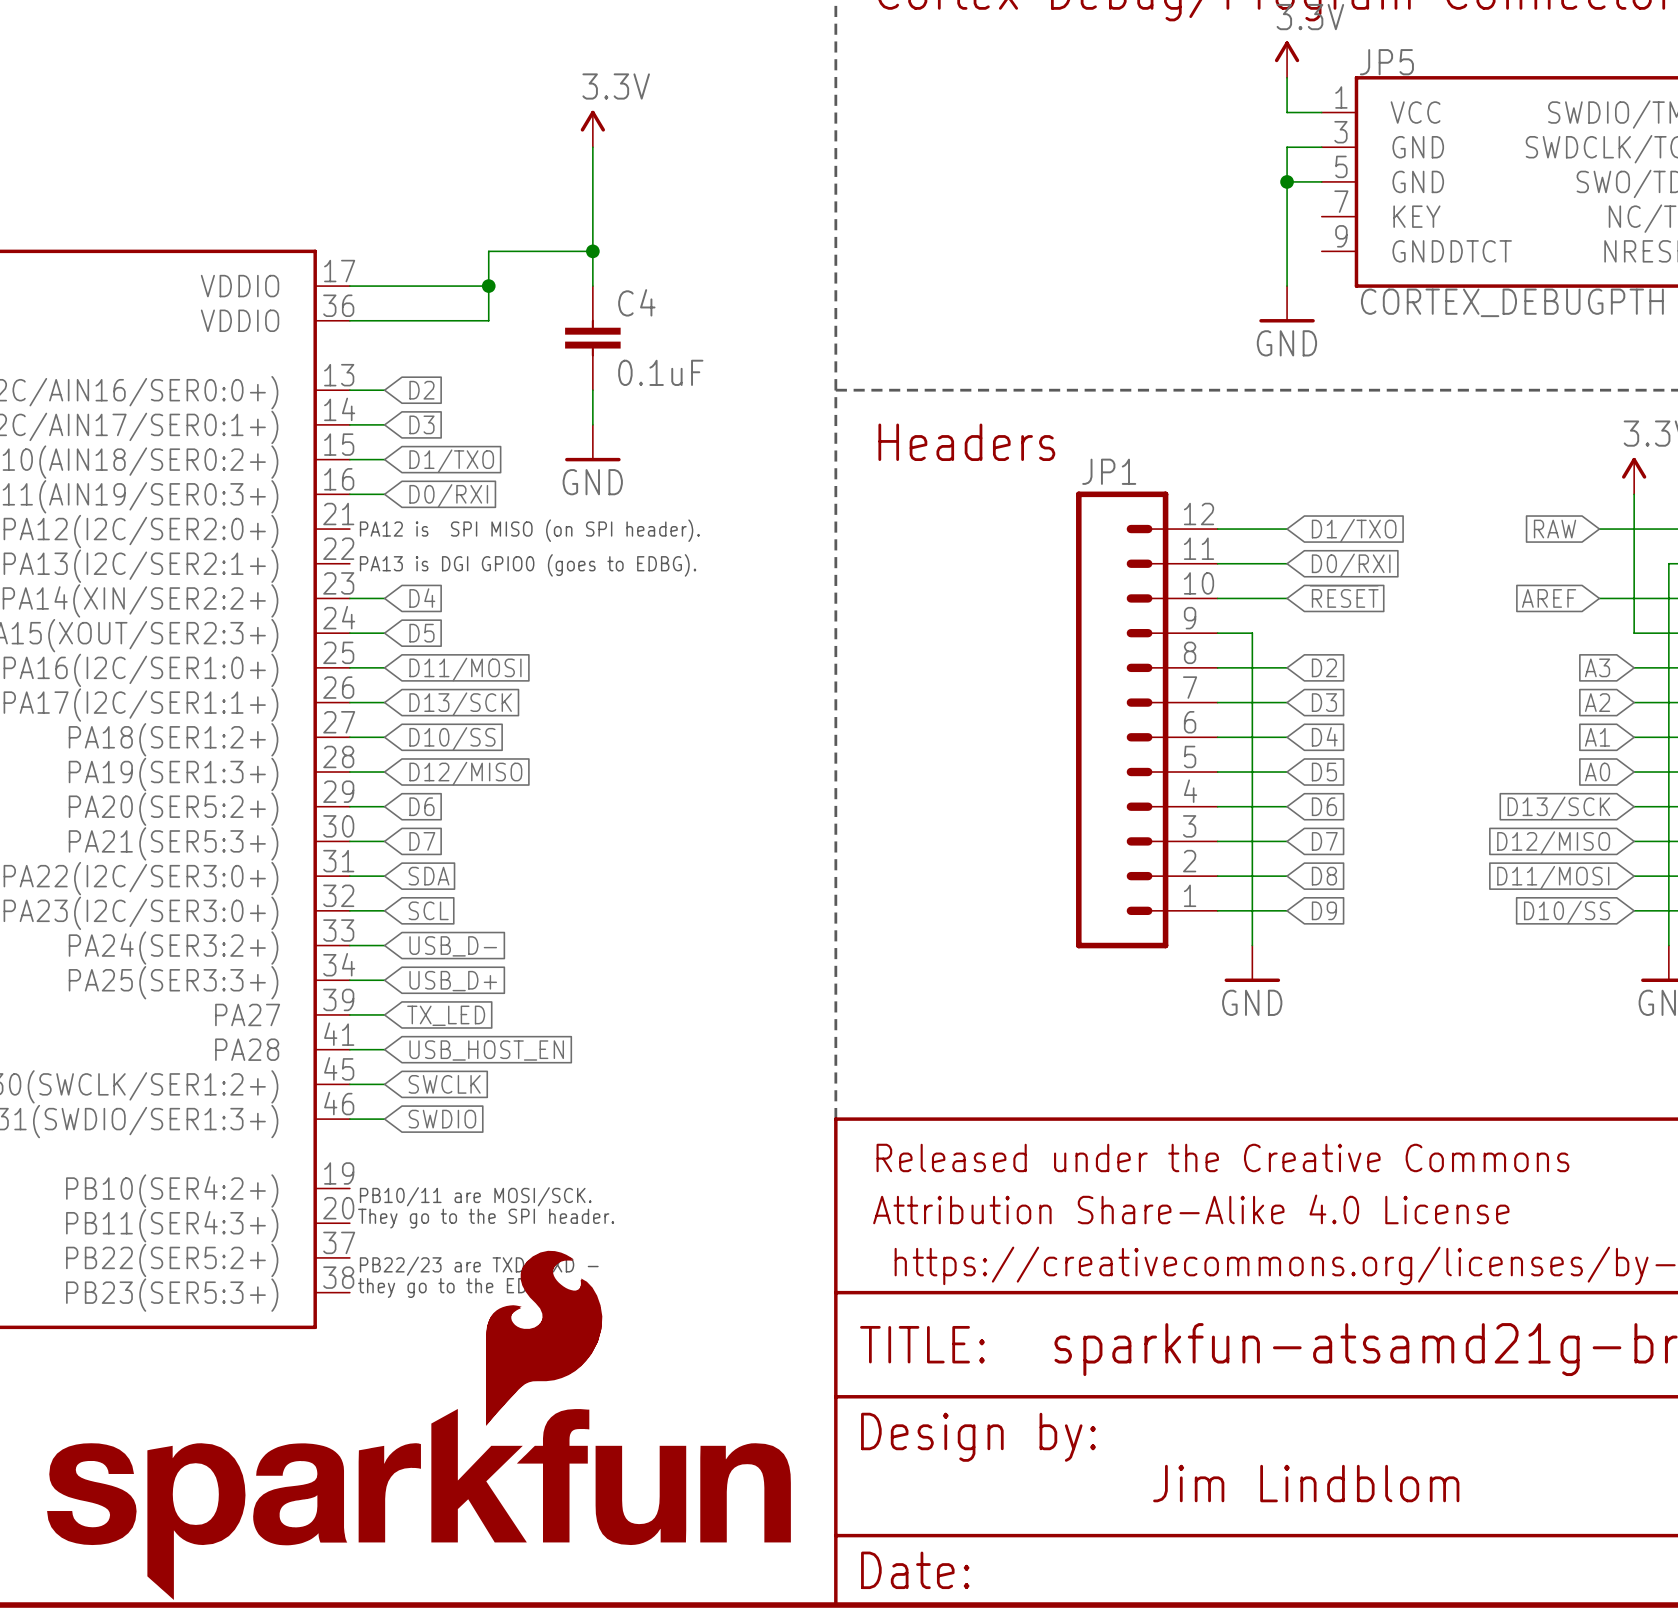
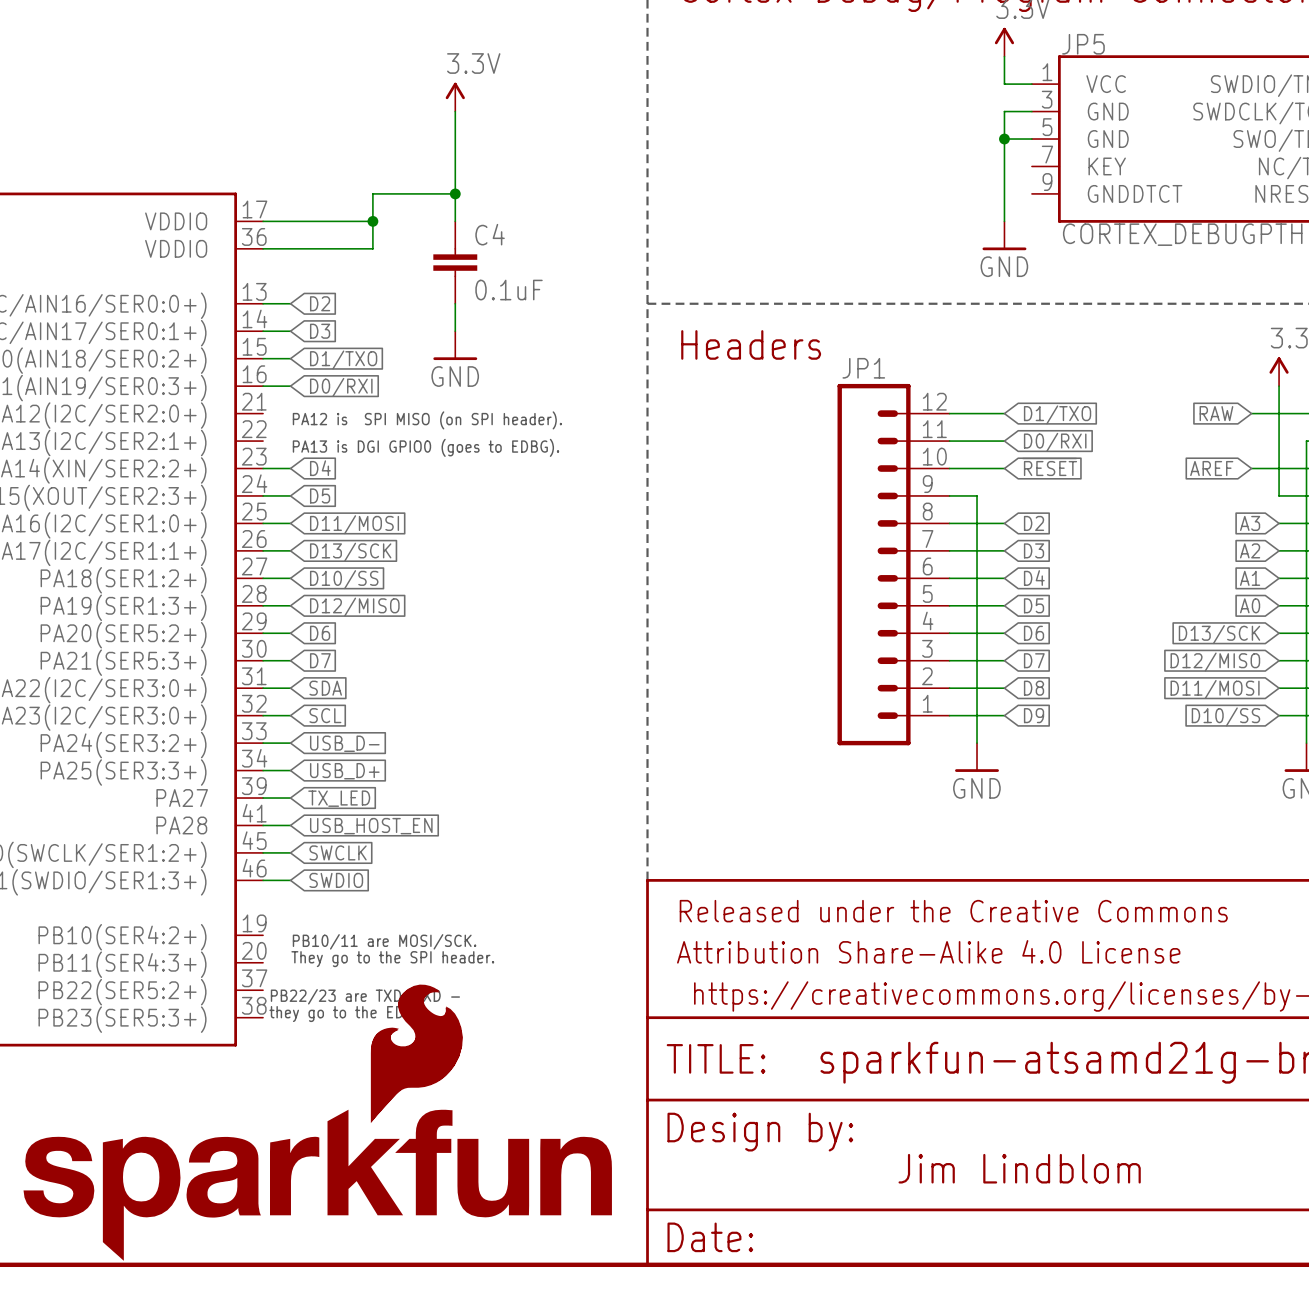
text position: PA12 is SPI MISO (on SPI header). (529, 530) -> PA12 is SPI MISO (on SPI header). (427, 420)
text position: PA13 is DGI GPIO0 (goes to EDBG). (528, 565) -> PA13 is DGI GPIO0 (goes to EDBG). (425, 447)
text position: PB10/11 are MOSI/SCK. (475, 1196) -> PB10/11 are MOSI/SCK. (384, 941)
text position: They go to the SPI header. (486, 1218) -> They go to the SPI header. (392, 959)

